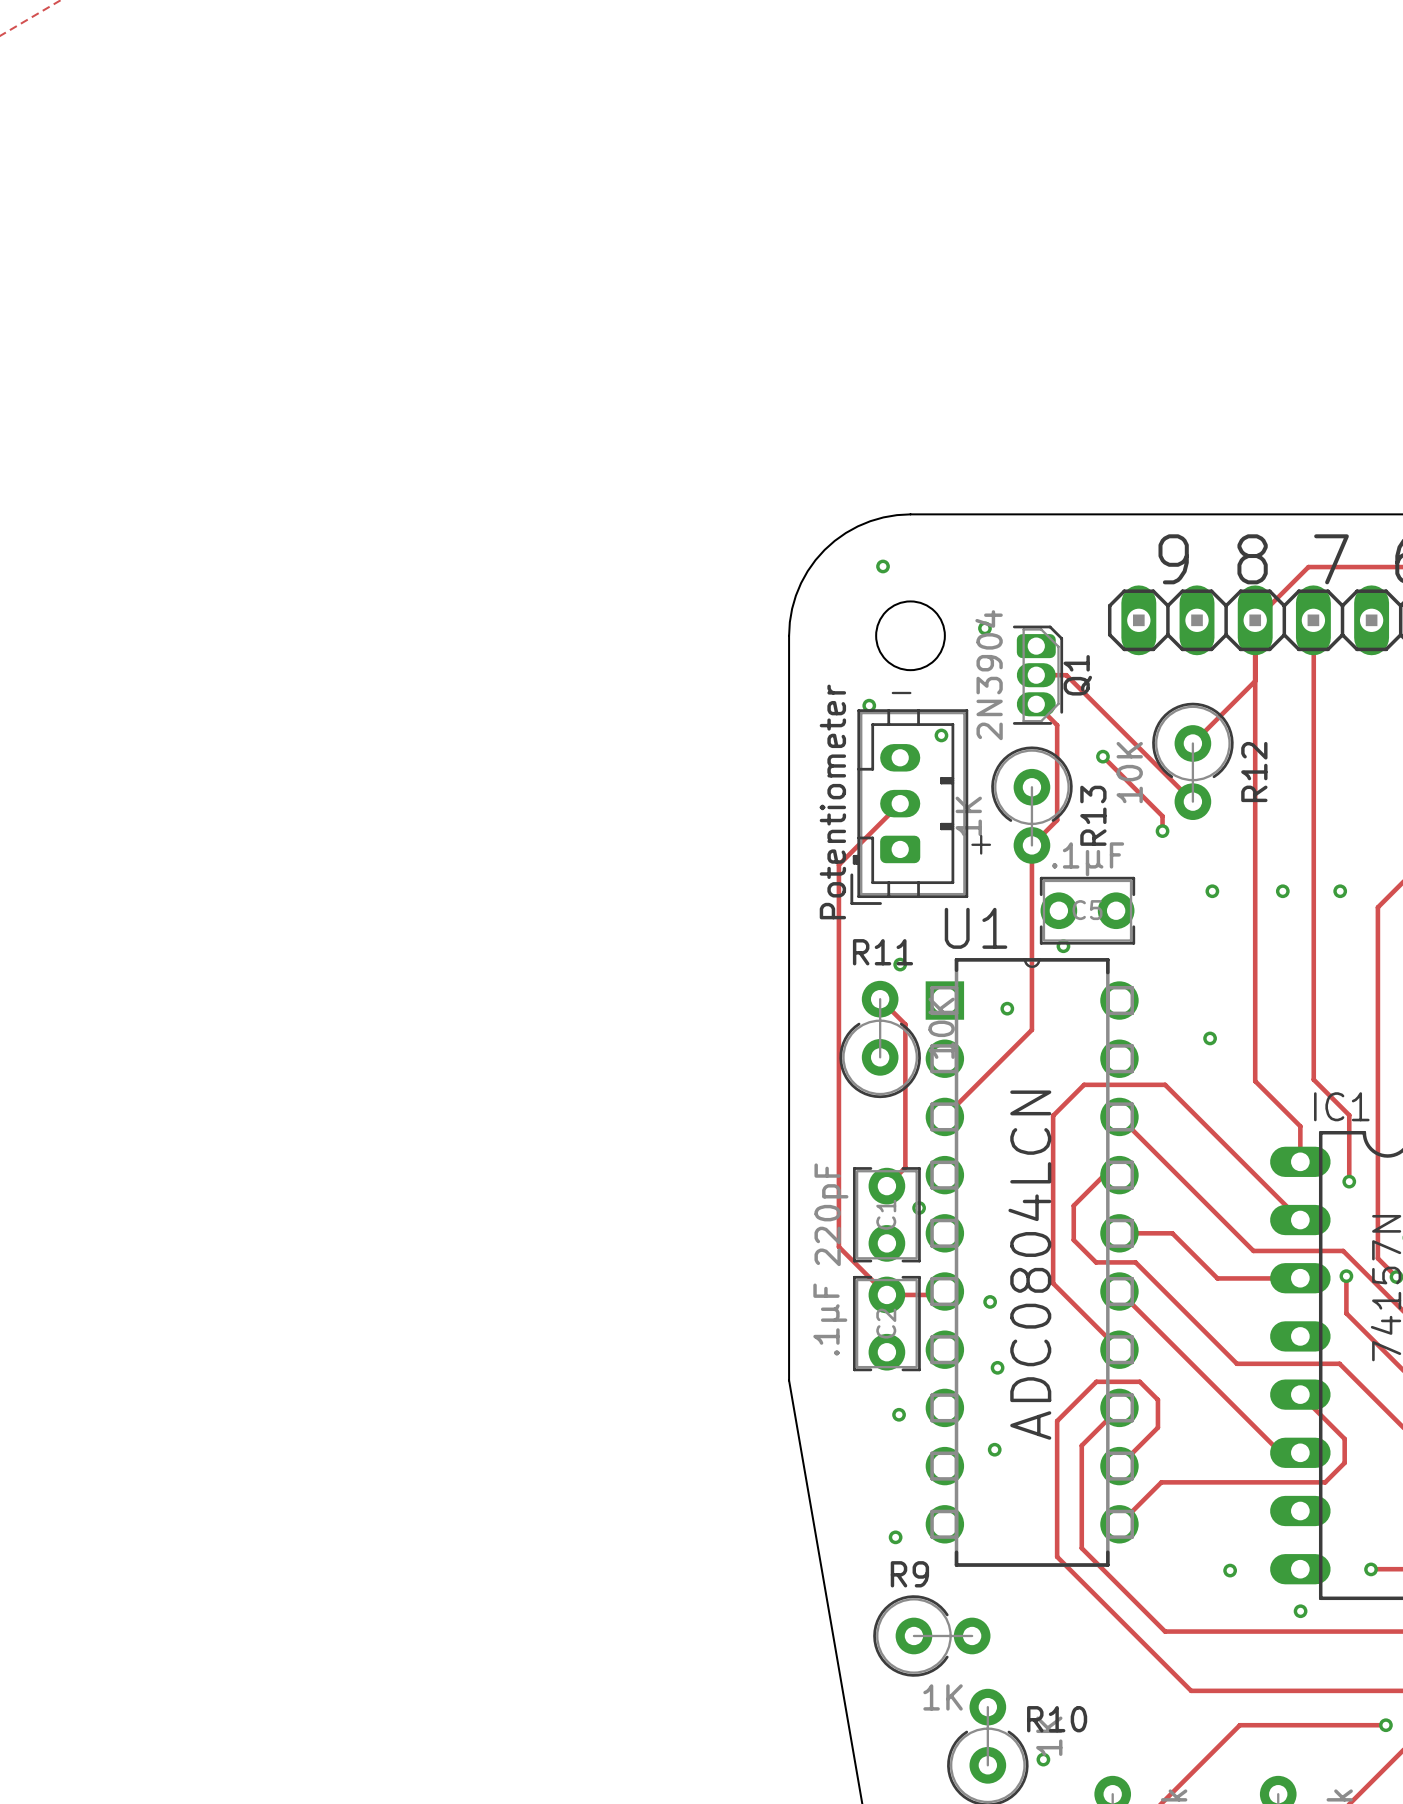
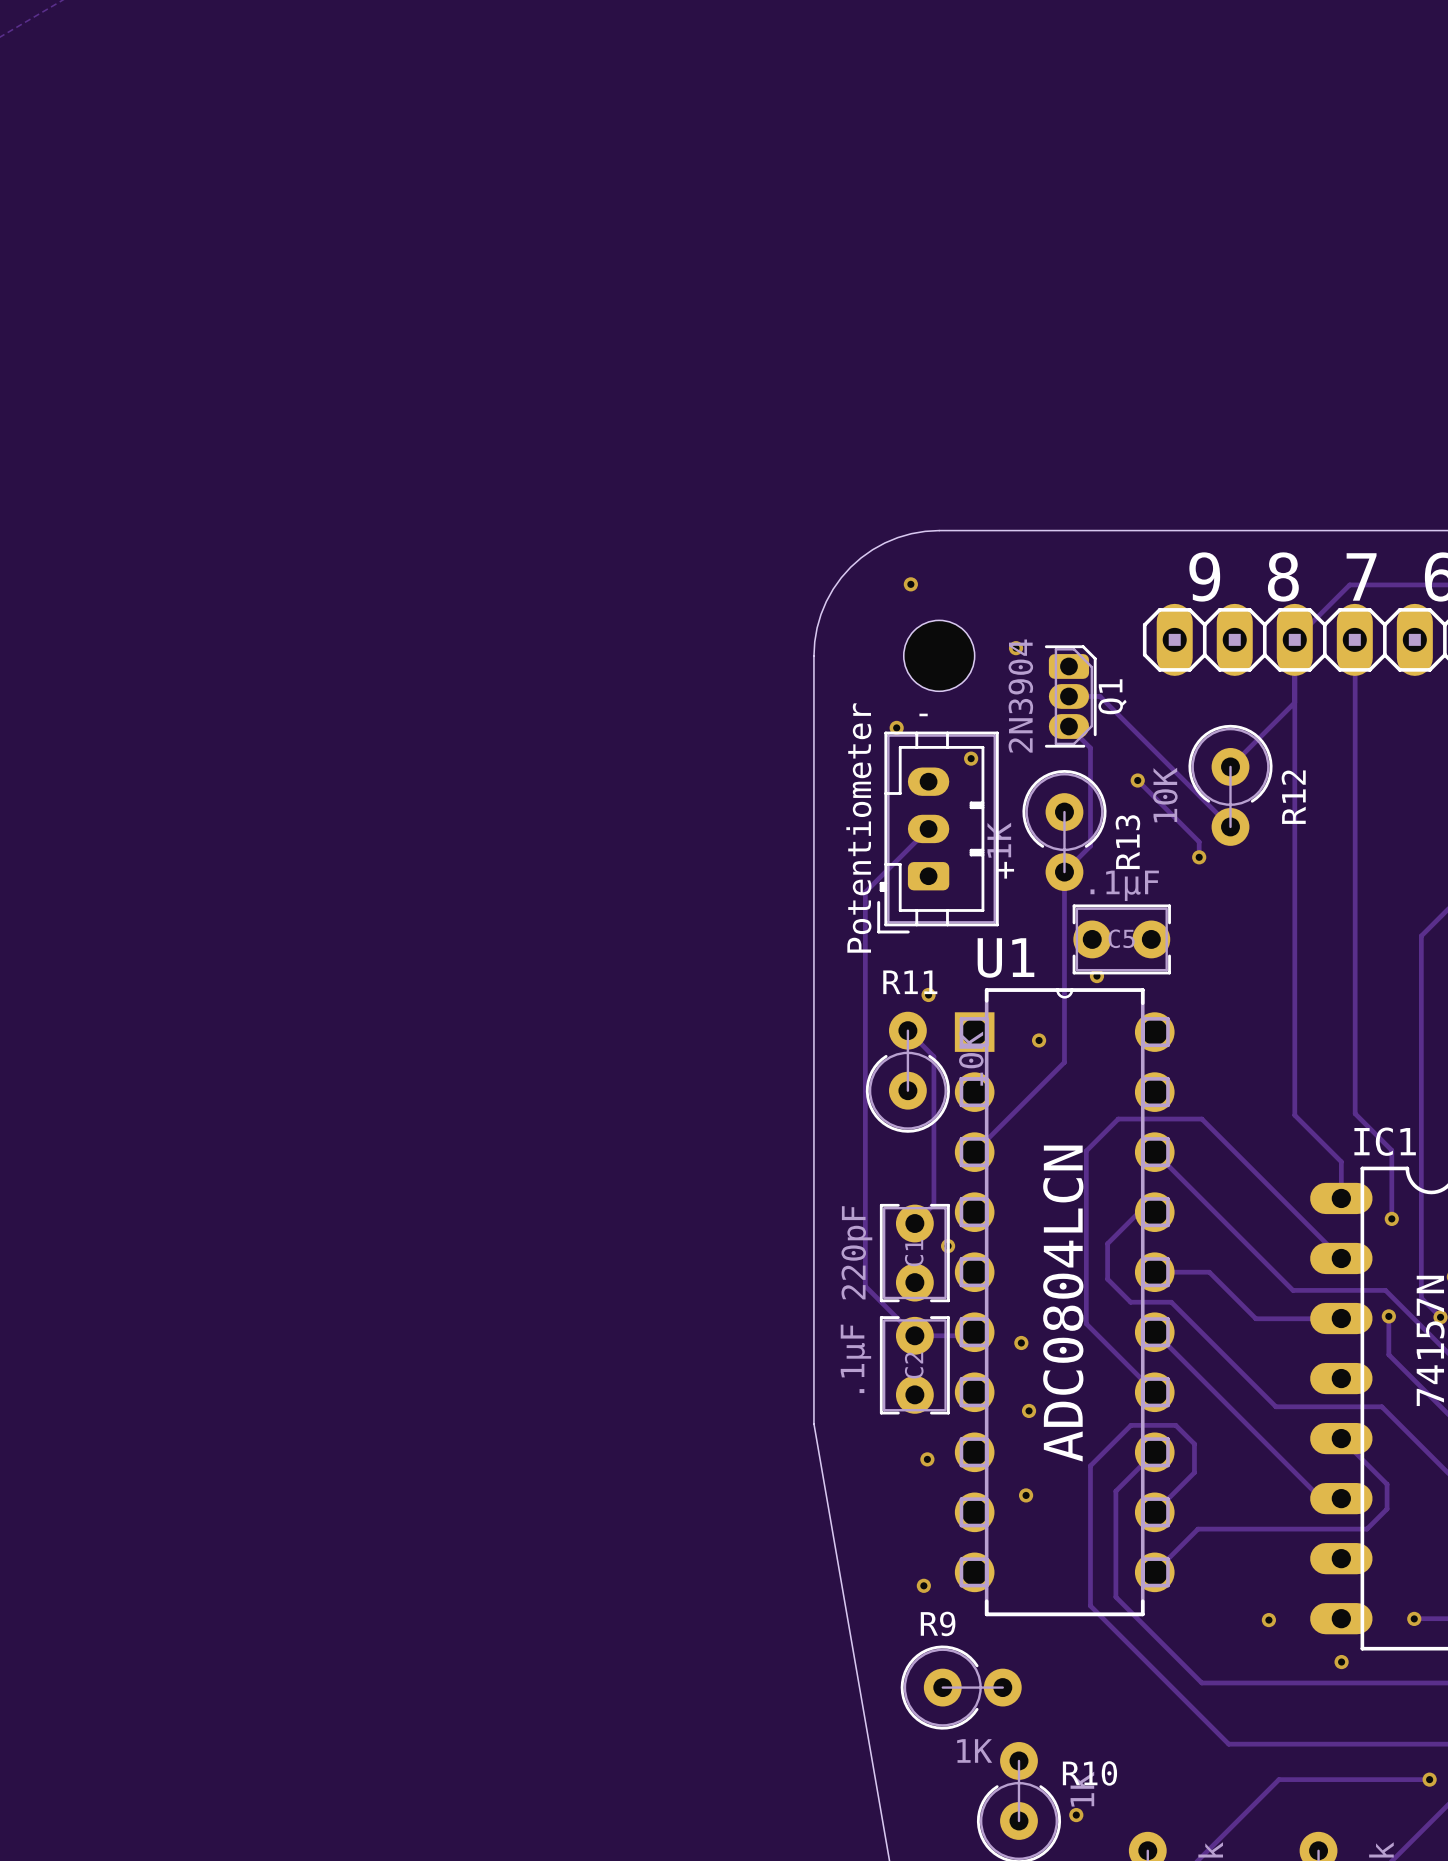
via: (1212, 891) -> none
via: (1282, 891) -> none
via: (1340, 891) -> none
via: (1210, 1038) -> none

